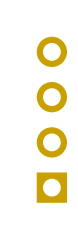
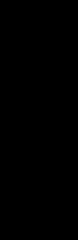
part: (51, 119) -> none

